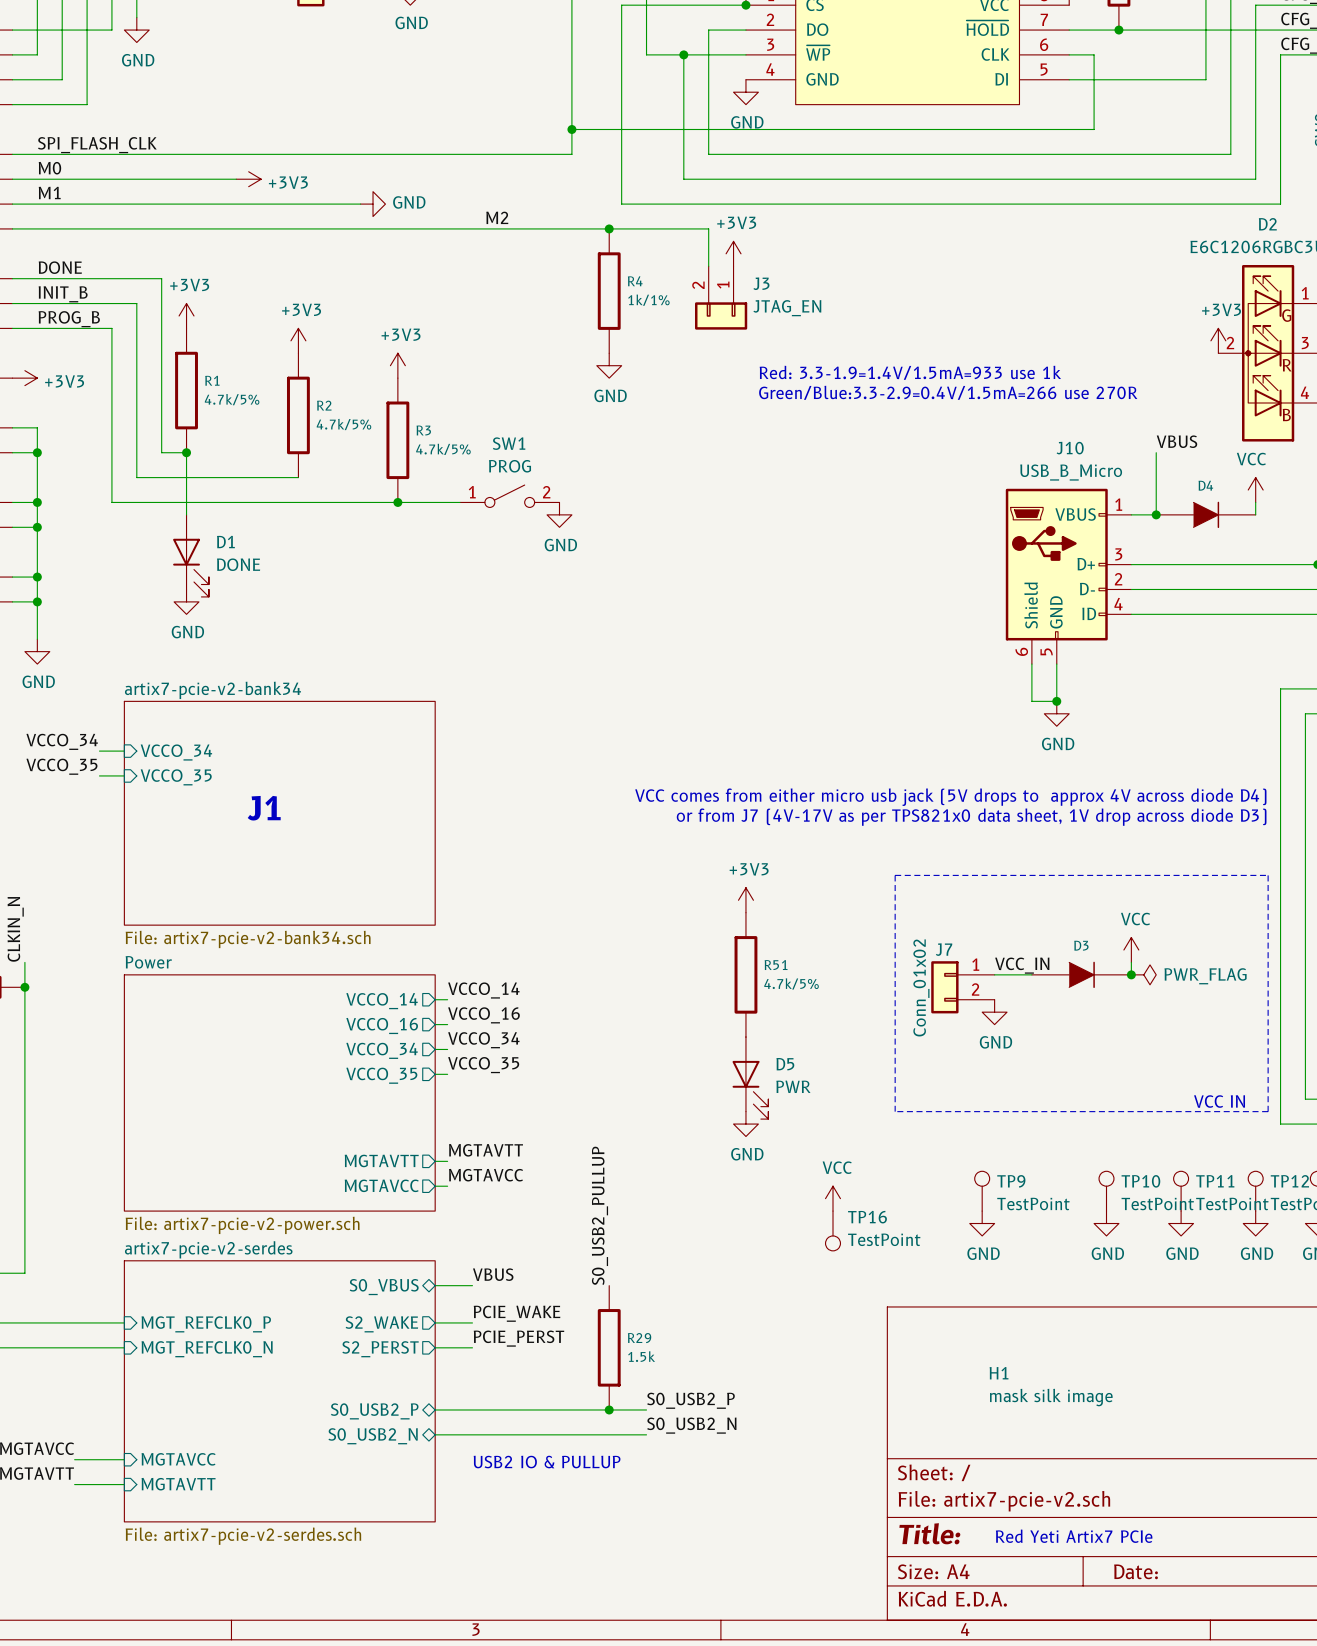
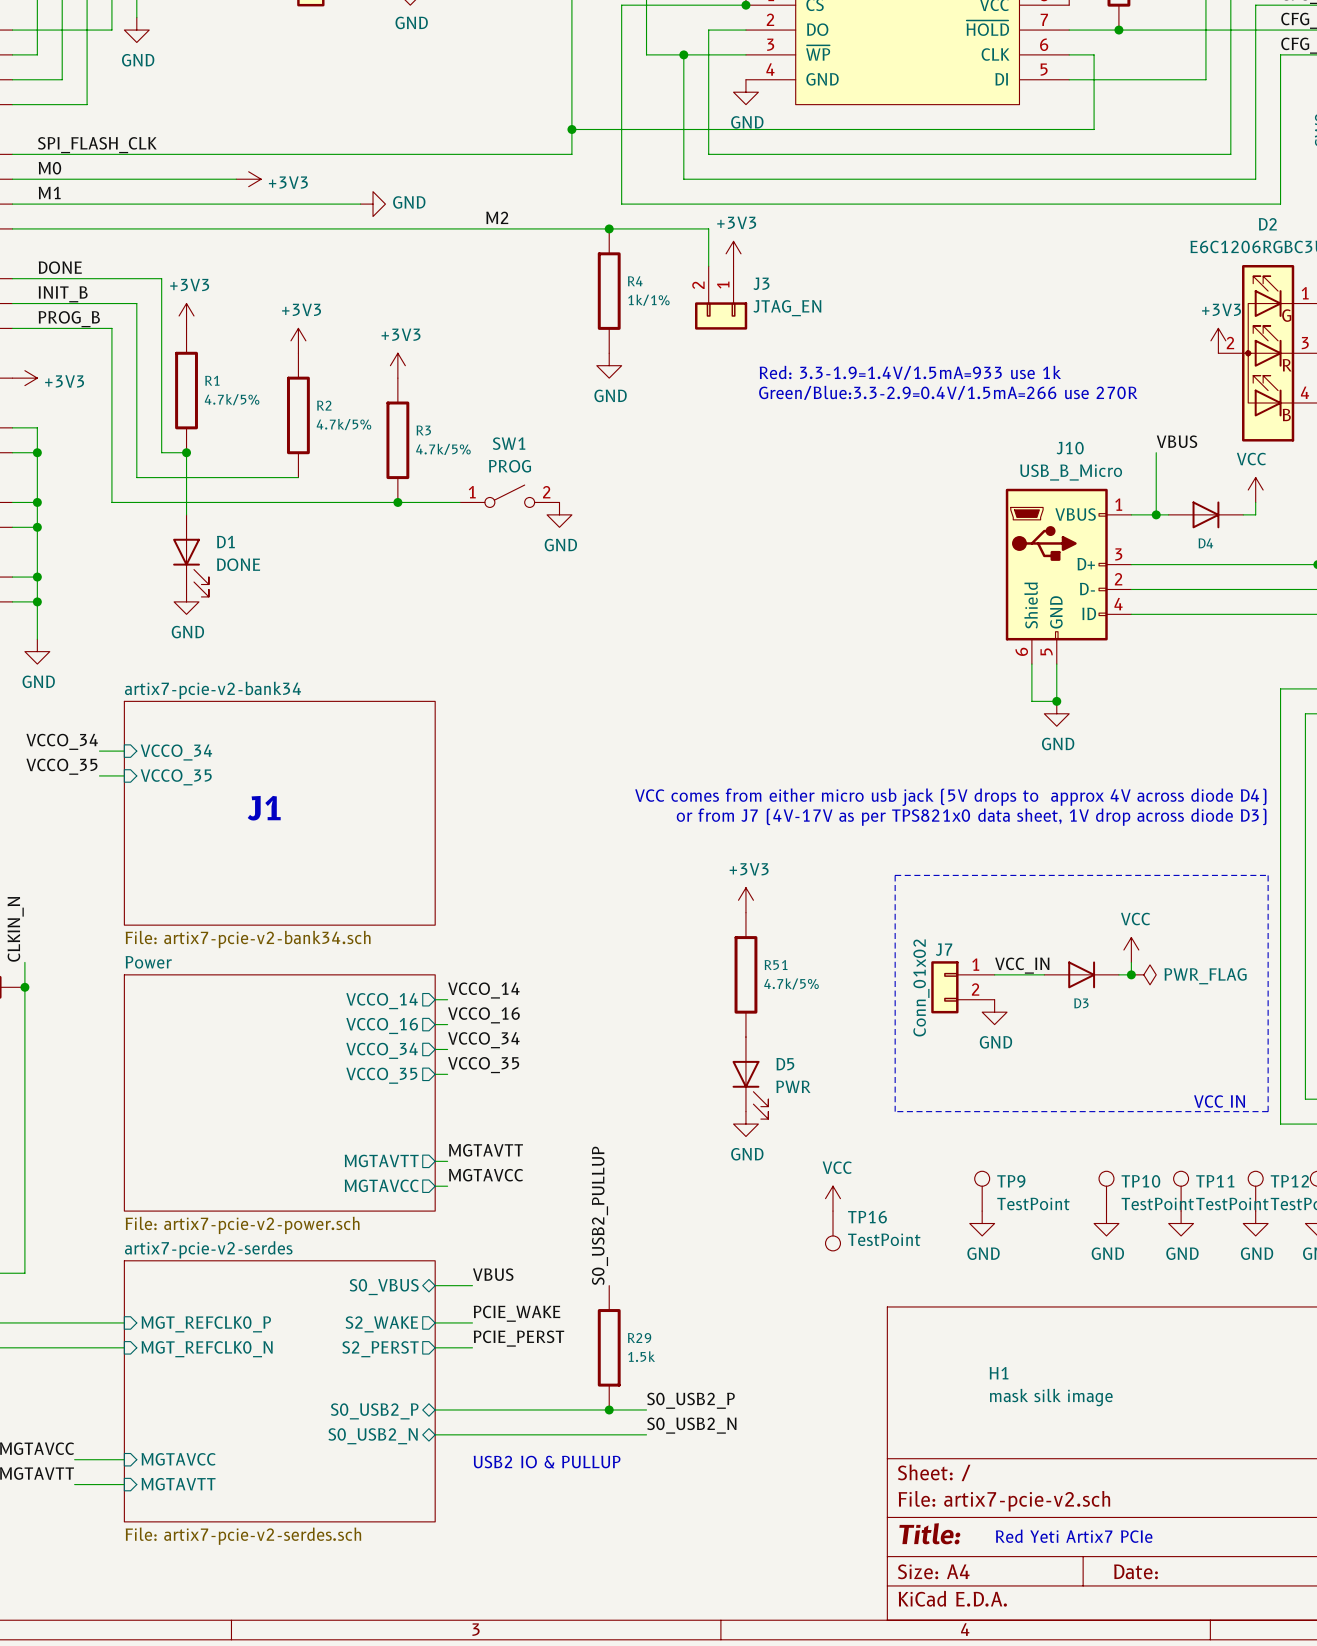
D4 name position: D4 (1205, 485) -> D4 (1205, 543)
D4 symbol: [1156, 501, 1256, 529] -> [1168, 501, 1244, 529]
D3 name position: D3 (1081, 945) -> D3 (1081, 1003)
D3 symbol: [1031, 961, 1132, 989] -> [1044, 961, 1119, 989]

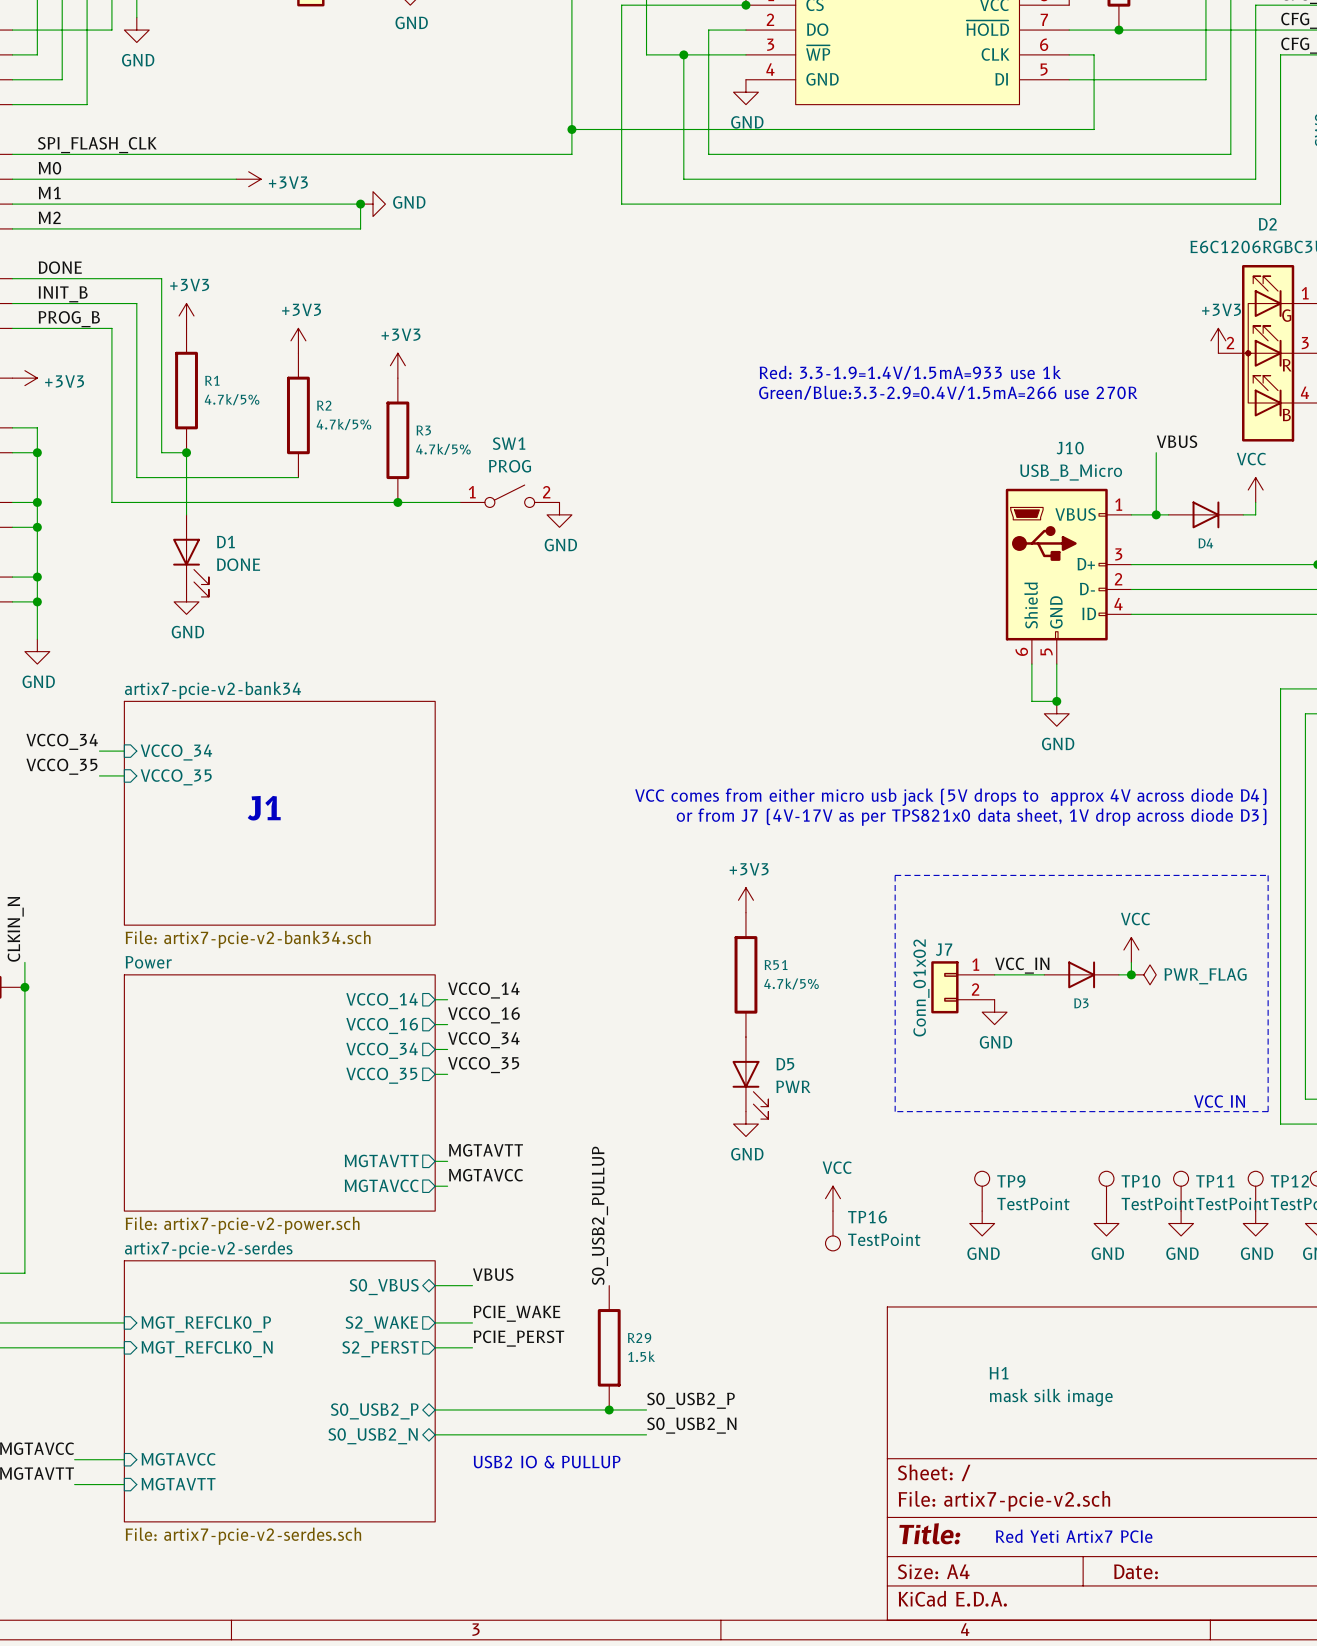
junction: none -> (360, 204)
label: none -> M2 (49, 217)
label: M2 (497, 217) -> none
wire: (360, 228) (708, 228) (708, 266) -> (360, 228) (360, 204)
junction: (609, 228) -> none
power symbol: +3V3 (733, 253) -> none
R4: 1k/1% (609, 291) -> none
J3: JTAG_EN (721, 297) -> none
power symbol: GND (609, 365) -> none

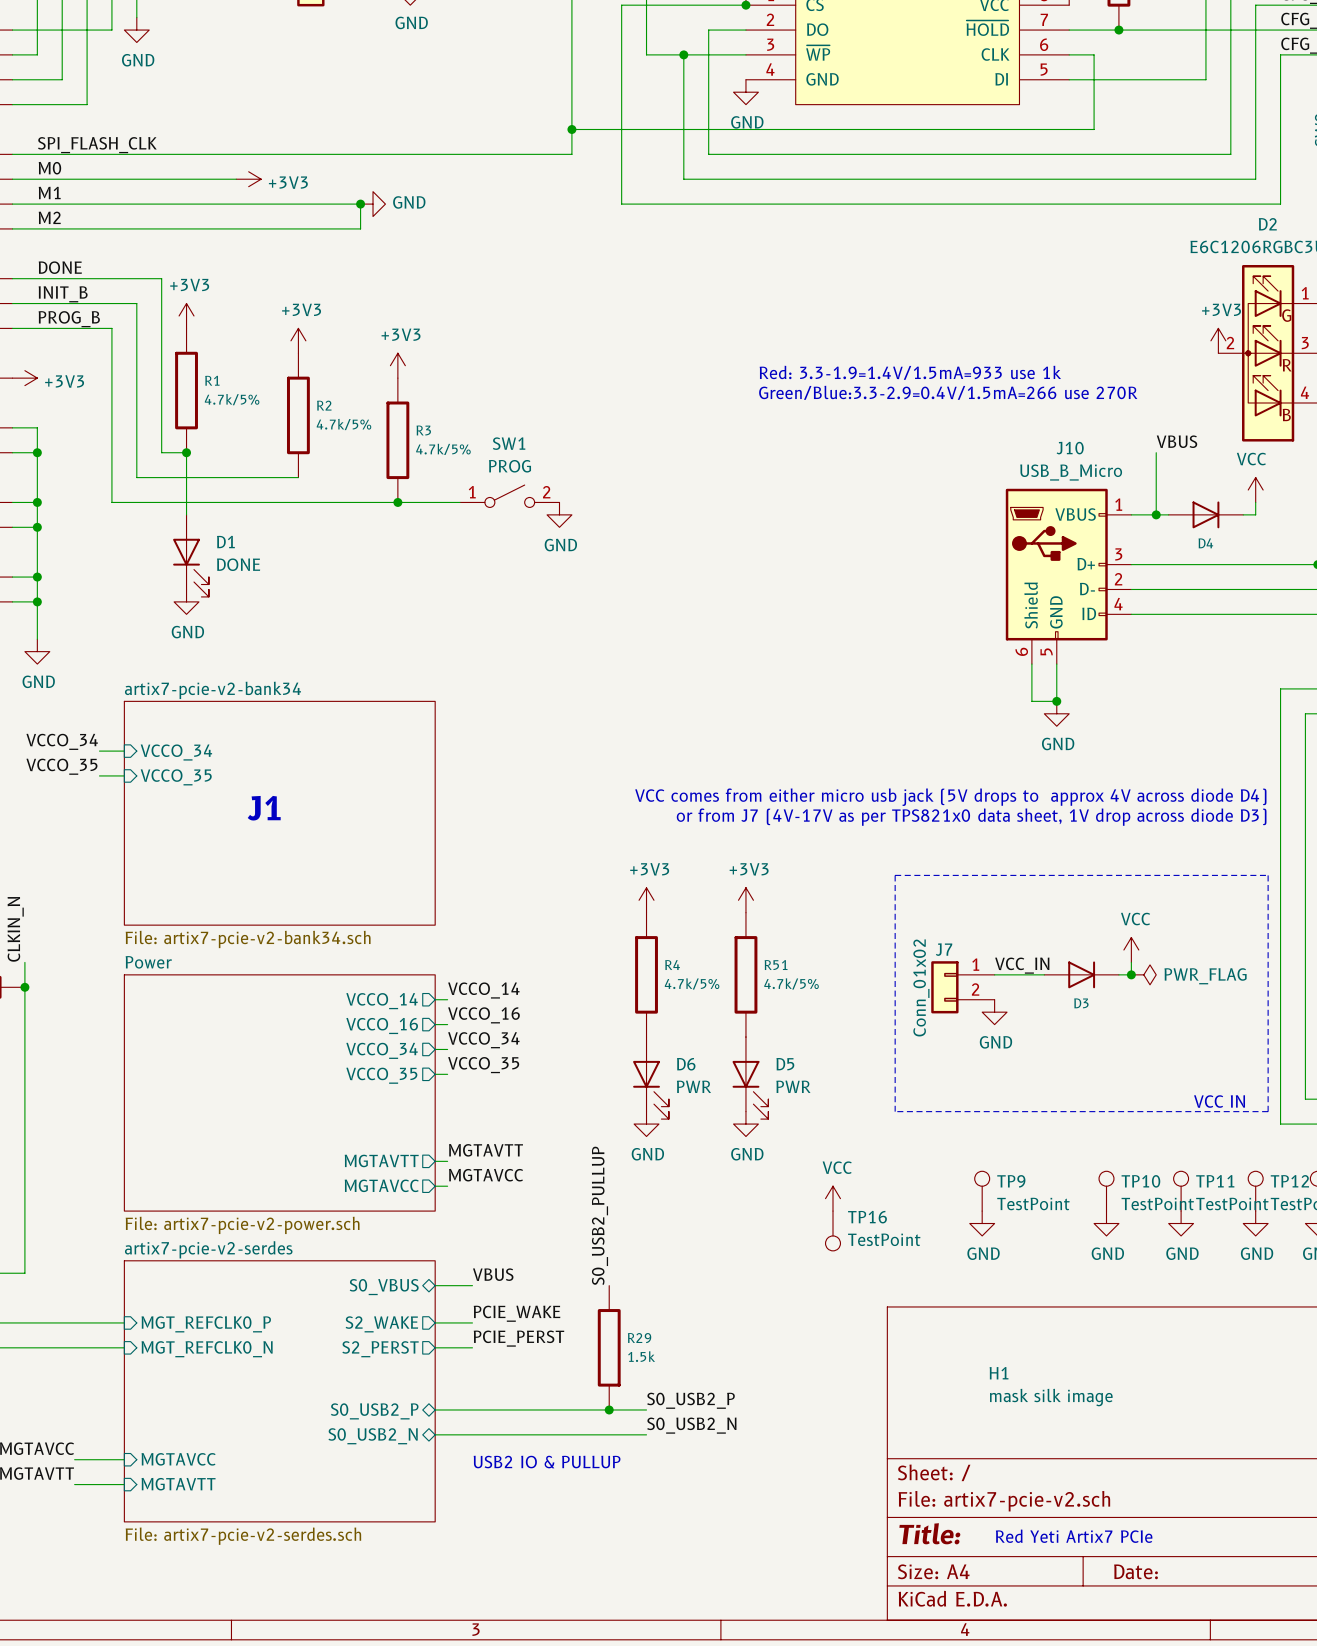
power symbol: none -> +3V3 (646, 900)
R4: none -> 4.7k/5% (646, 974)
D6: none -> PWR (650, 1078)
power symbol: none -> GND (646, 1124)

